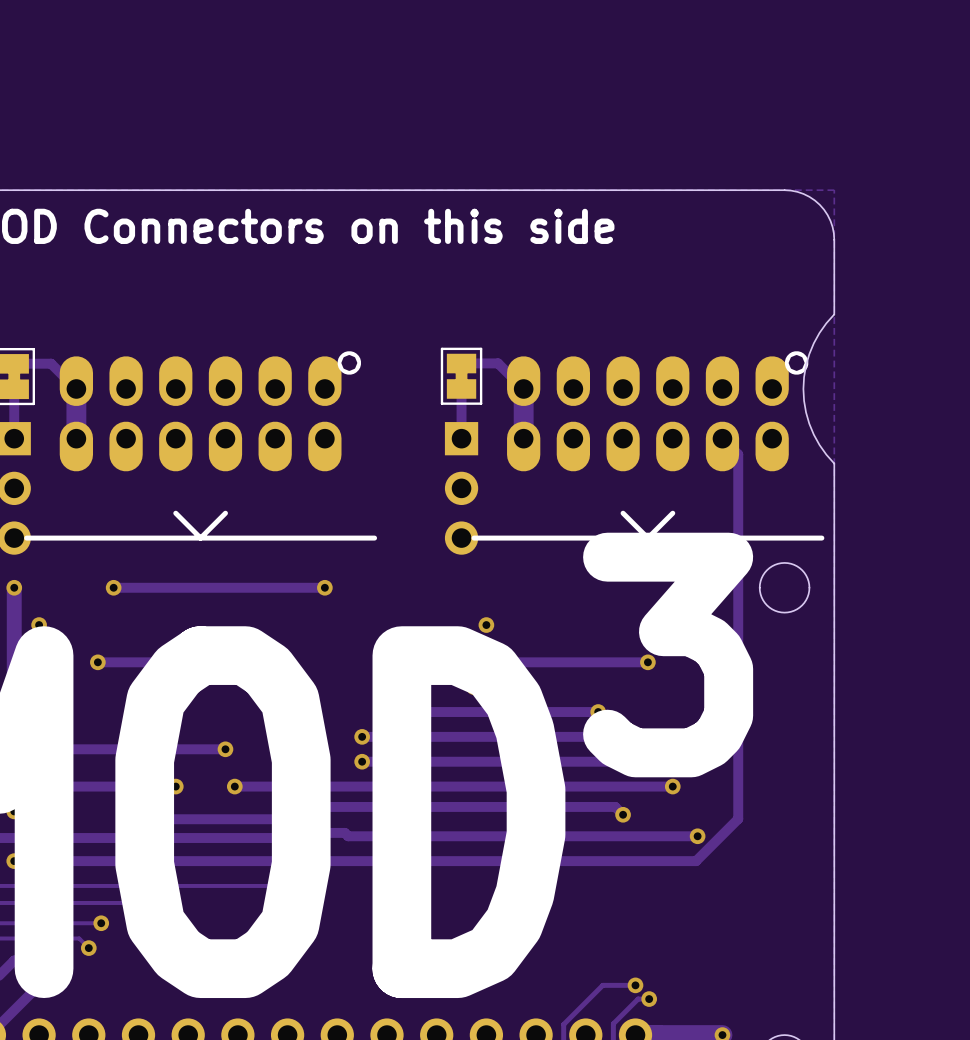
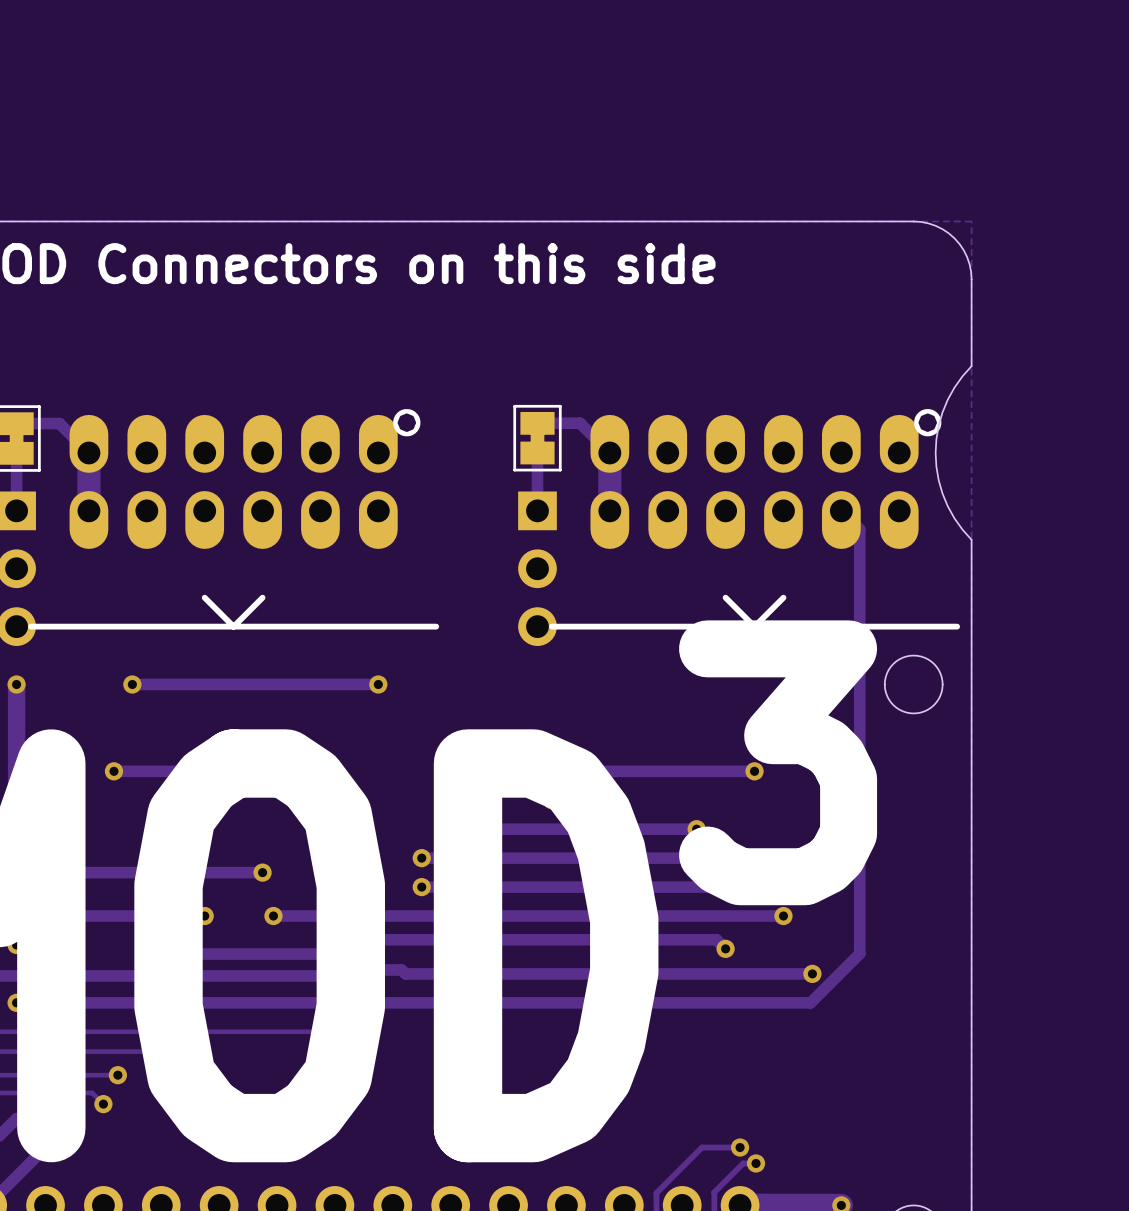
via: (39, 625) -> none
via: (486, 625) -> none

